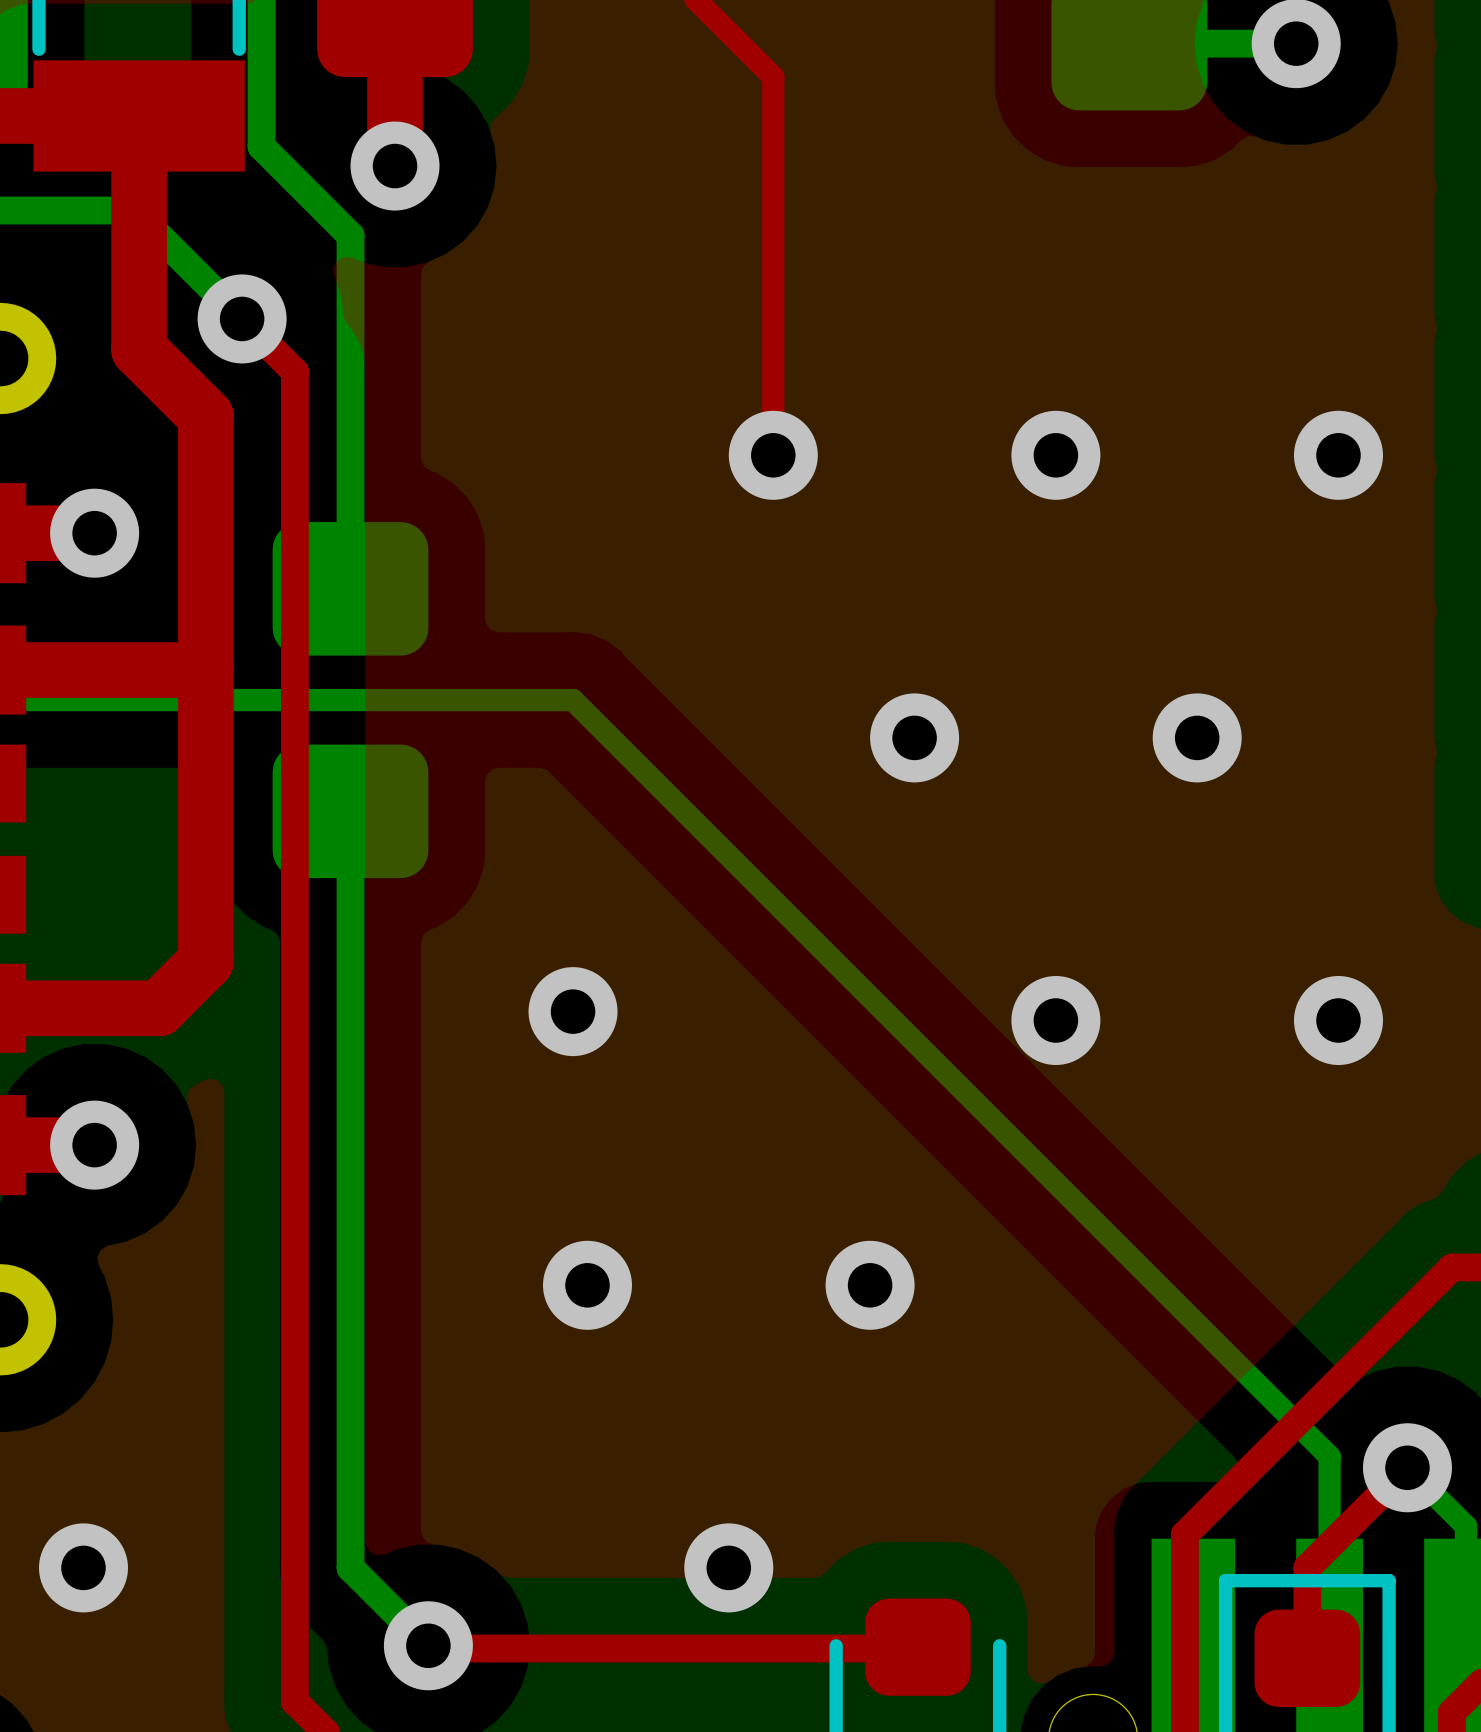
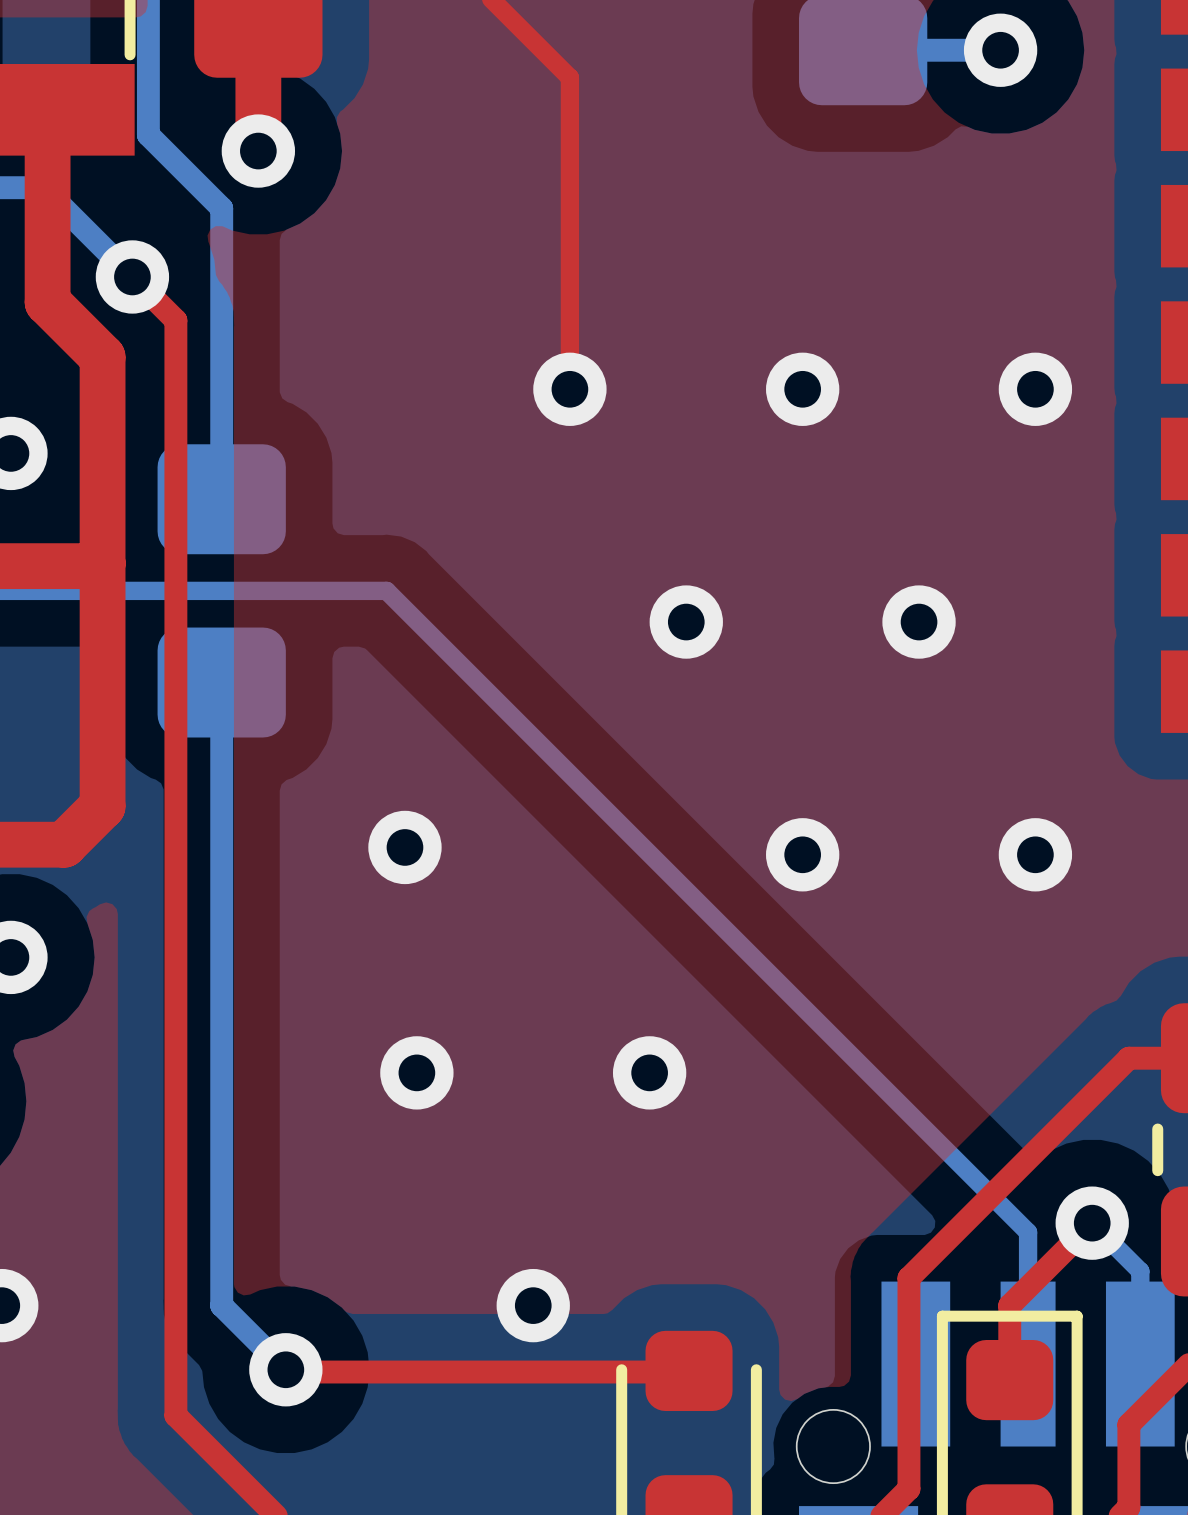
bottom track: (550, 700) (573, 700) (1329, 1456) (1329, 1478) -> (386, 590) (1028, 1232)

